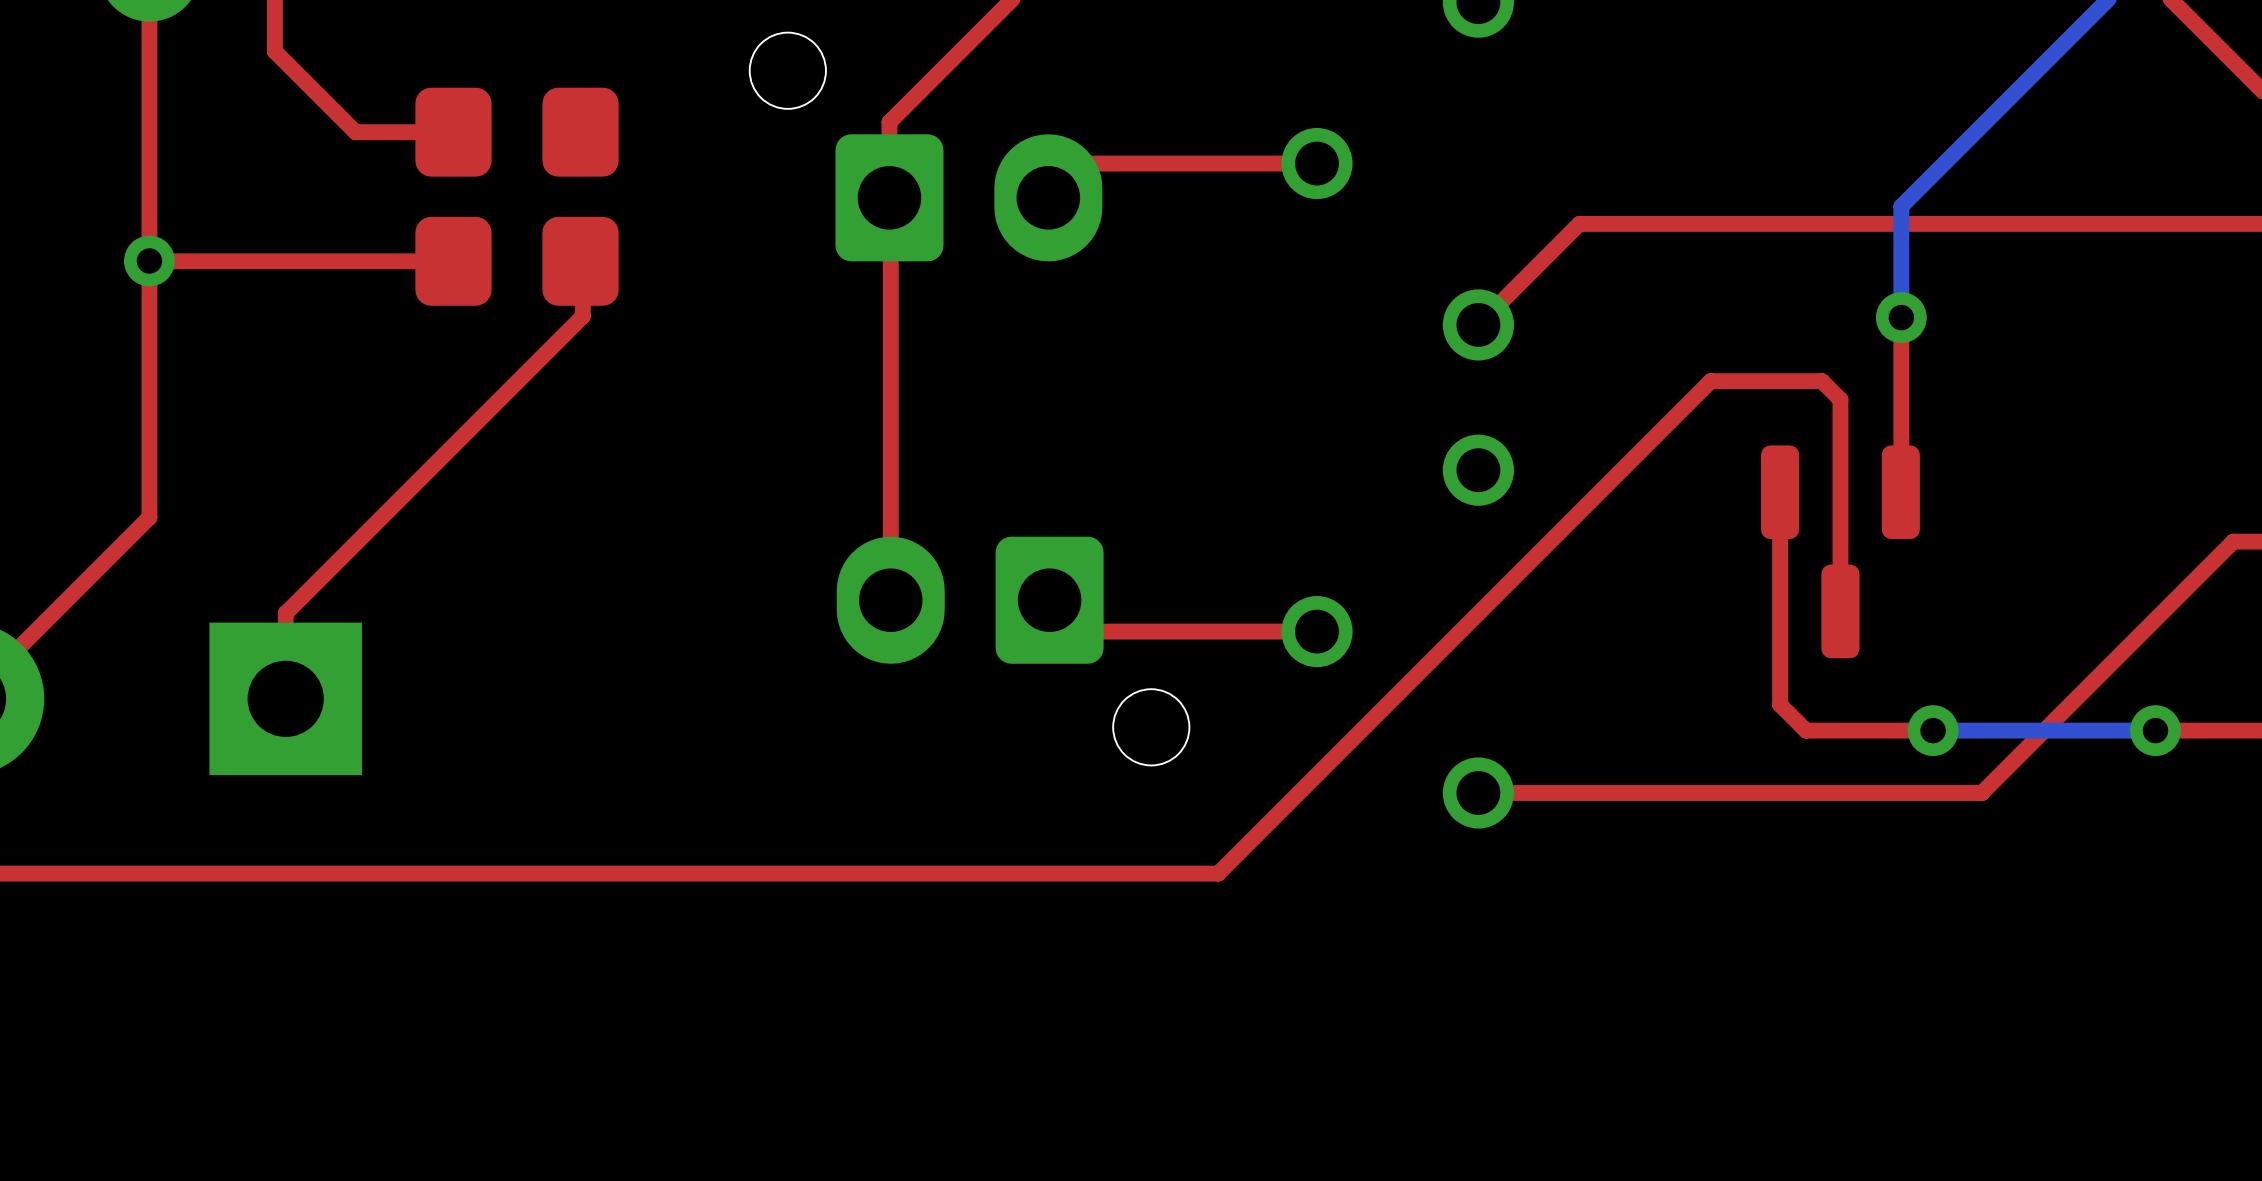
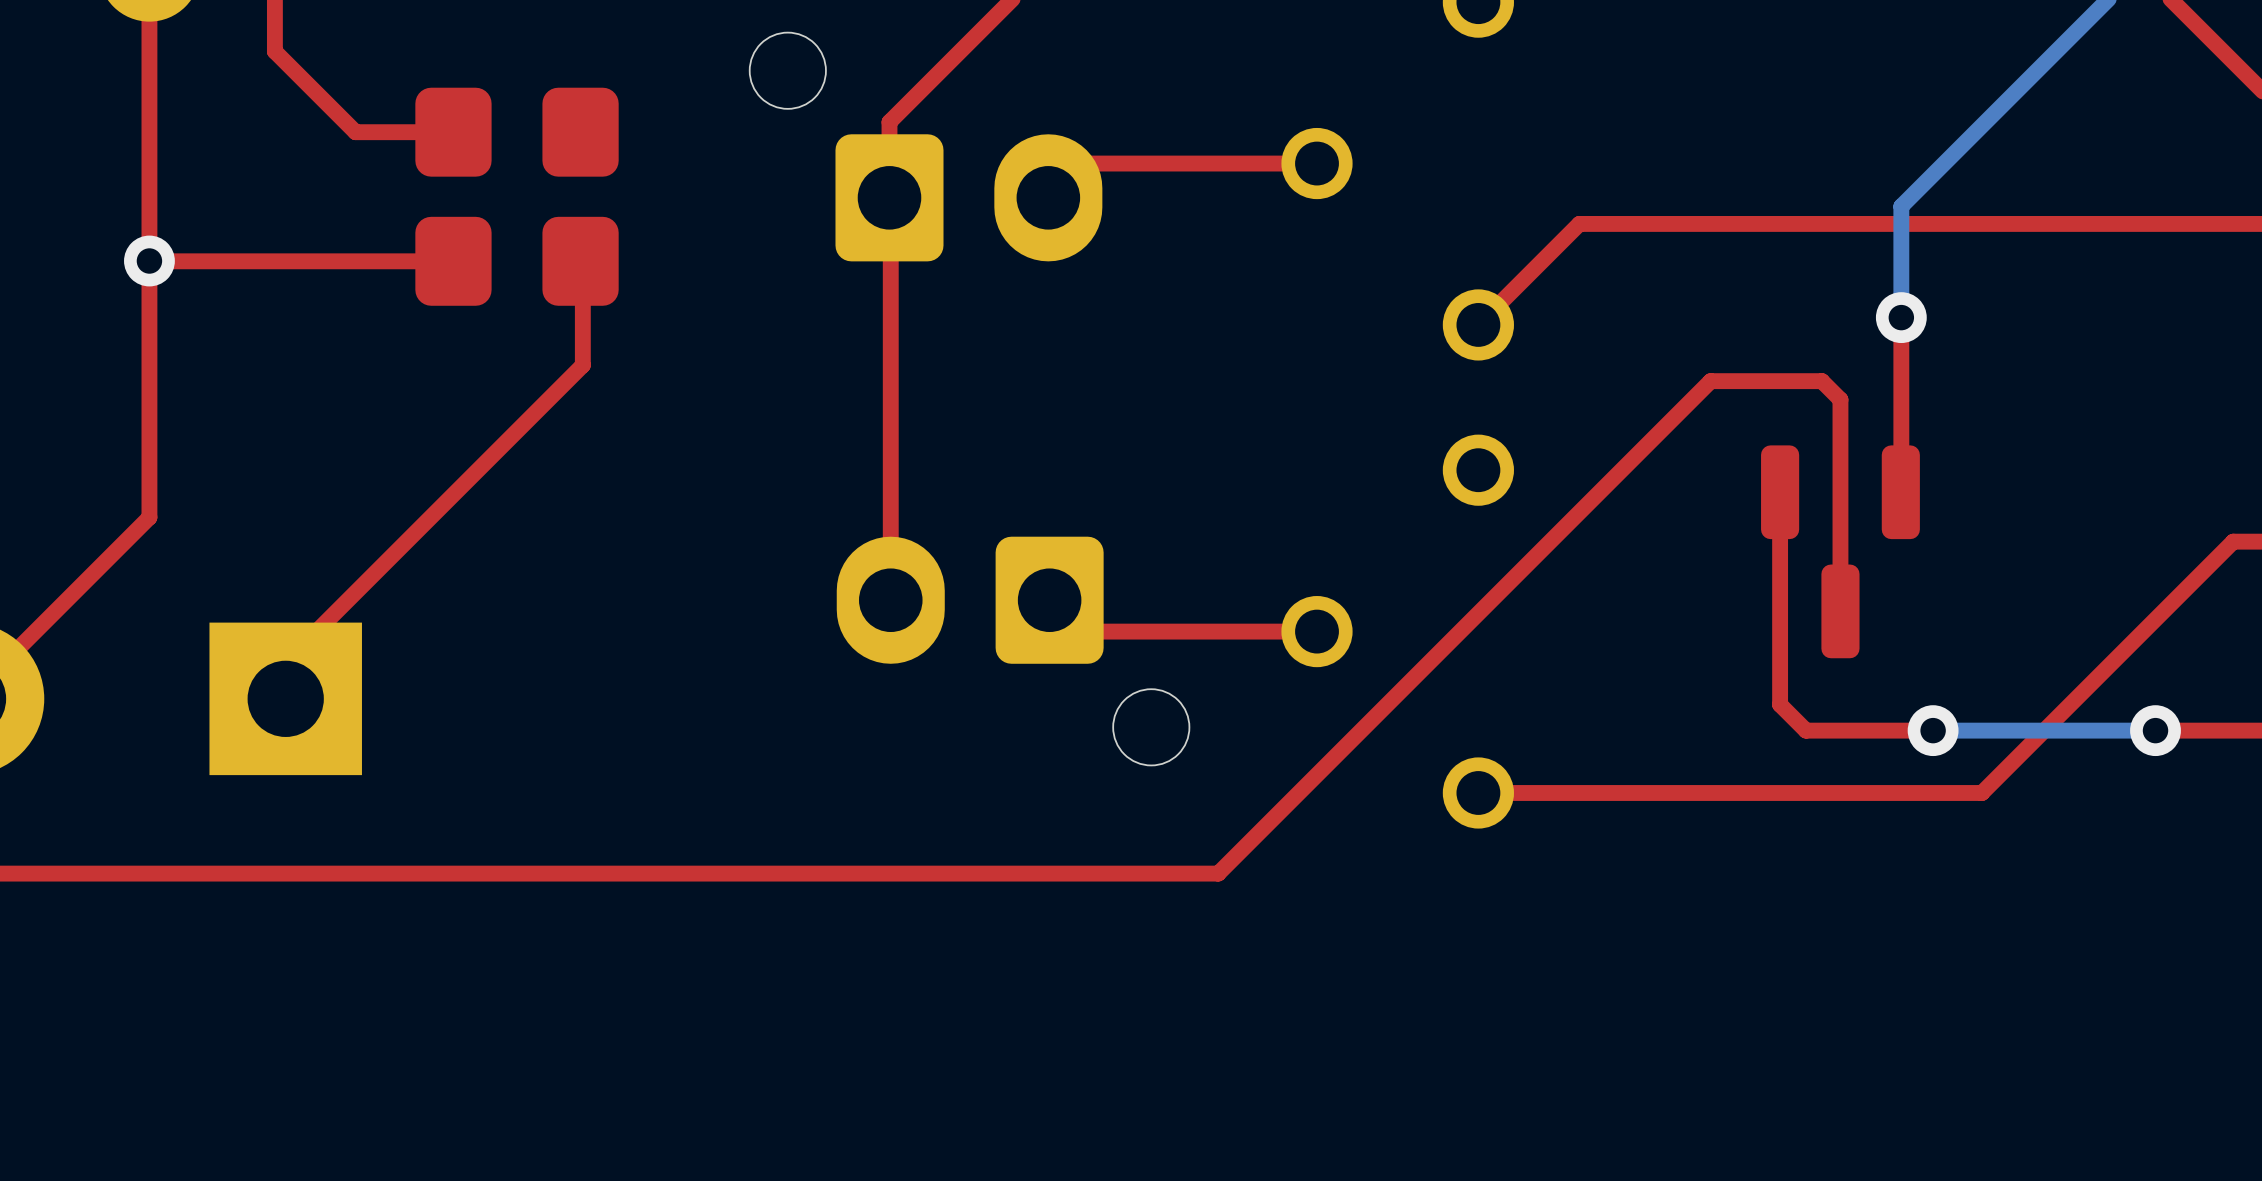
top track: (582, 316) (285, 613) (285, 662) -> (582, 316) (582, 365) (285, 662)

